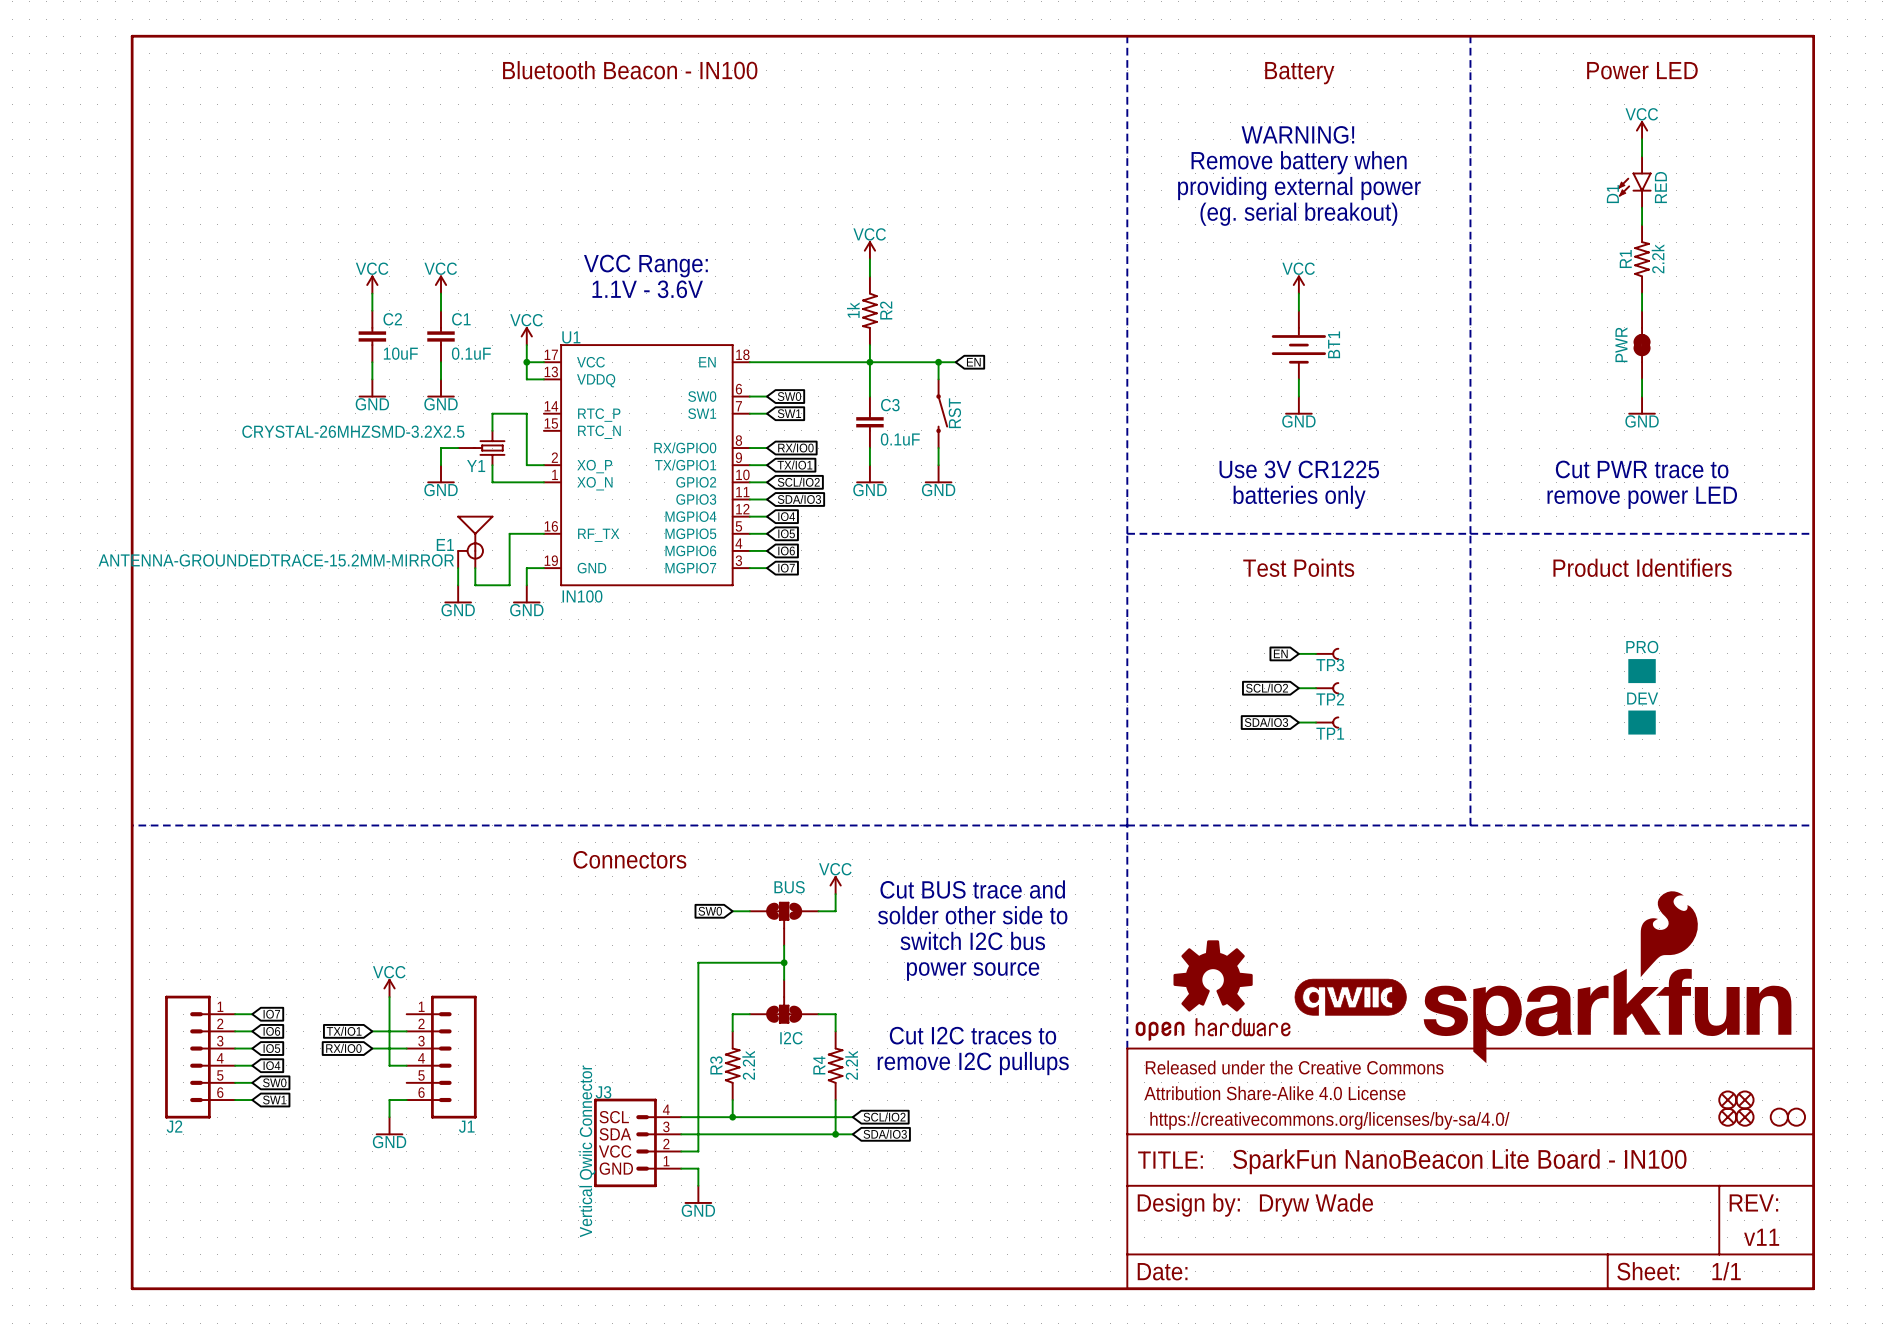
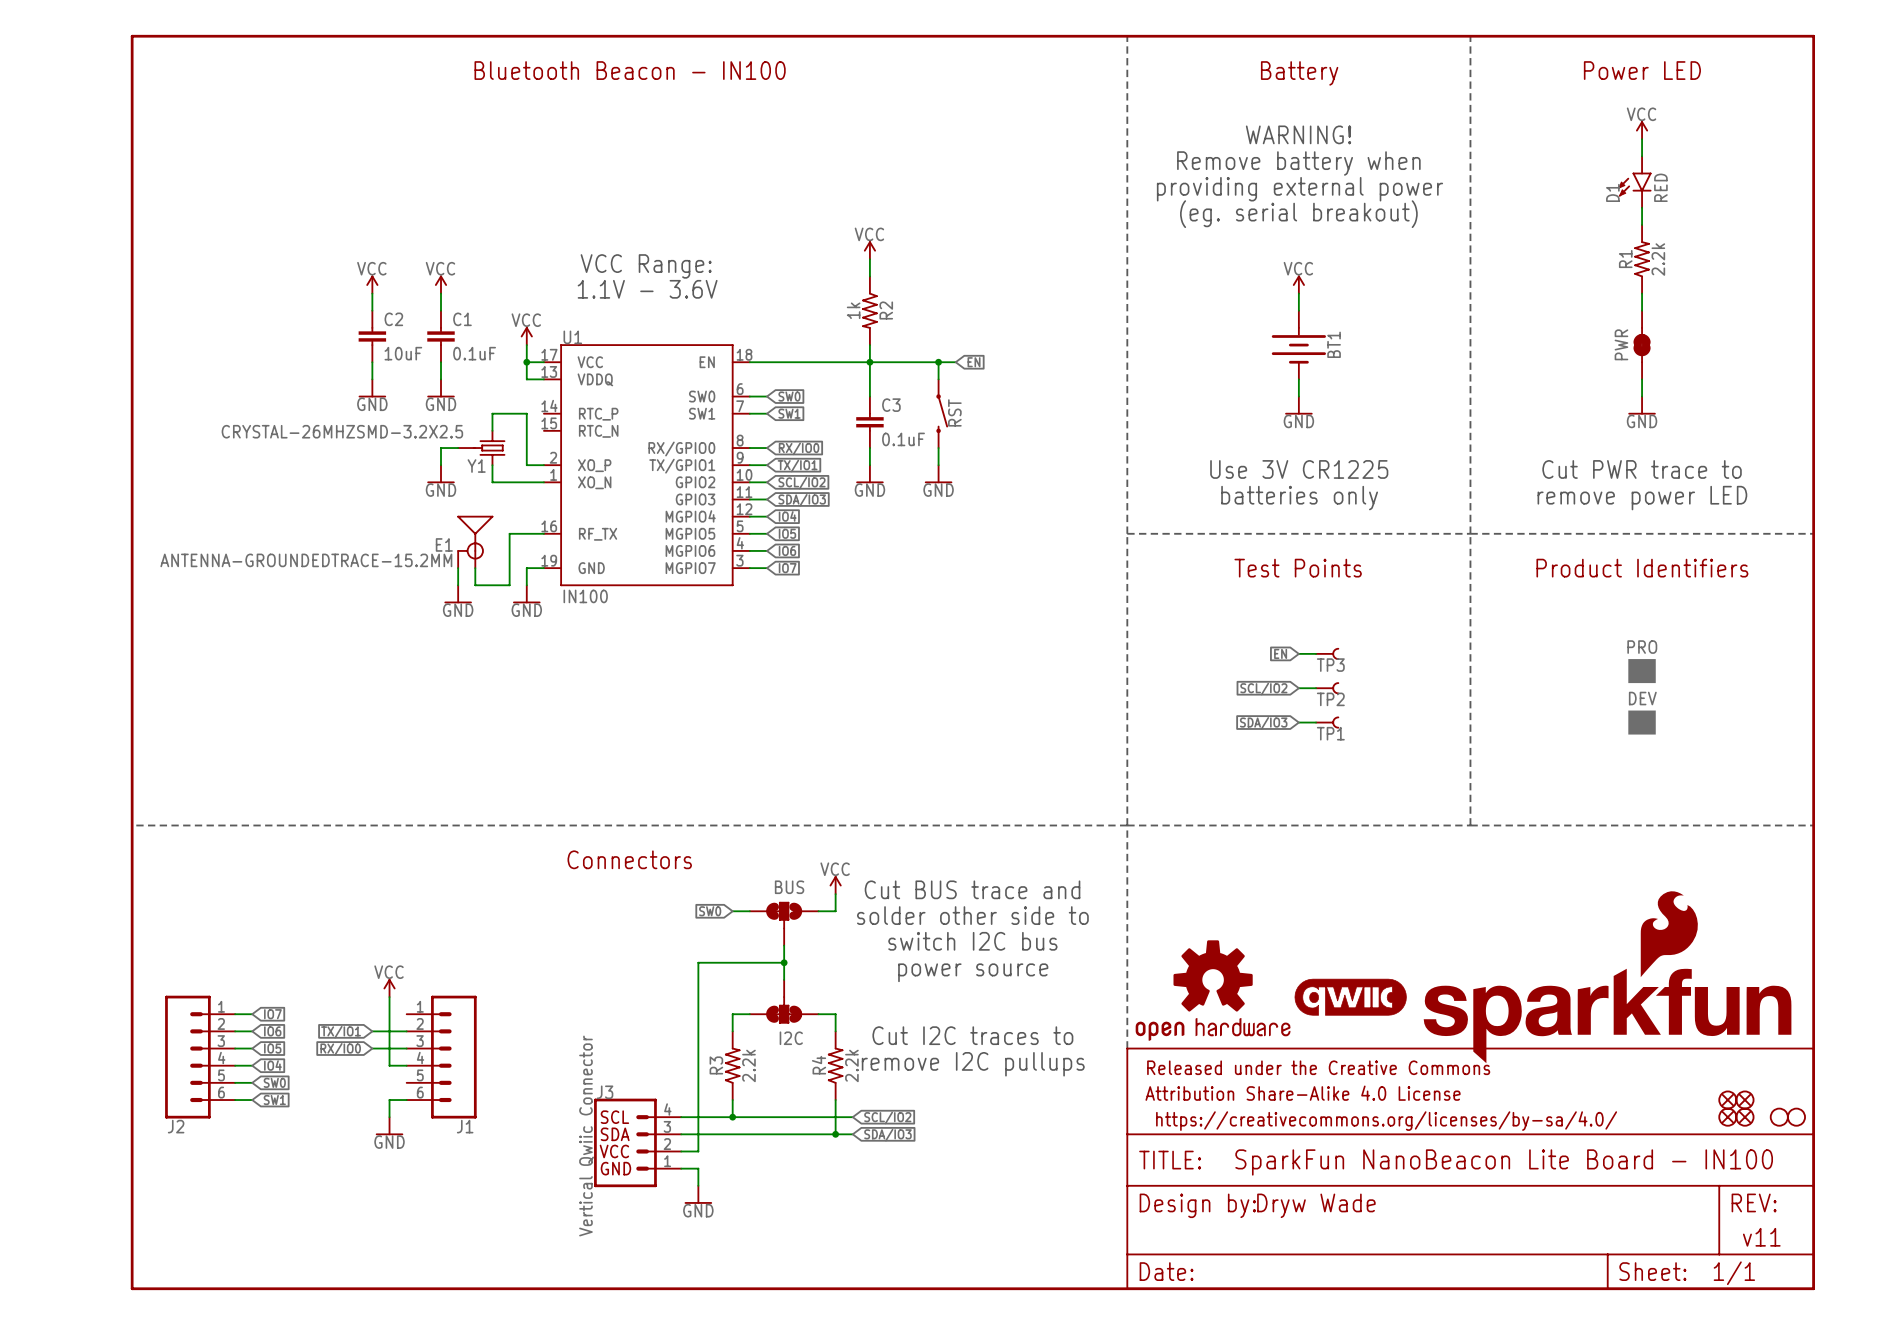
E1 value: ANTENNA-GROUNDEDTRACE-15.2MM-MIRROR (276, 560) -> ANTENNA-GROUNDEDTRACE-15.2MM (306, 560)

